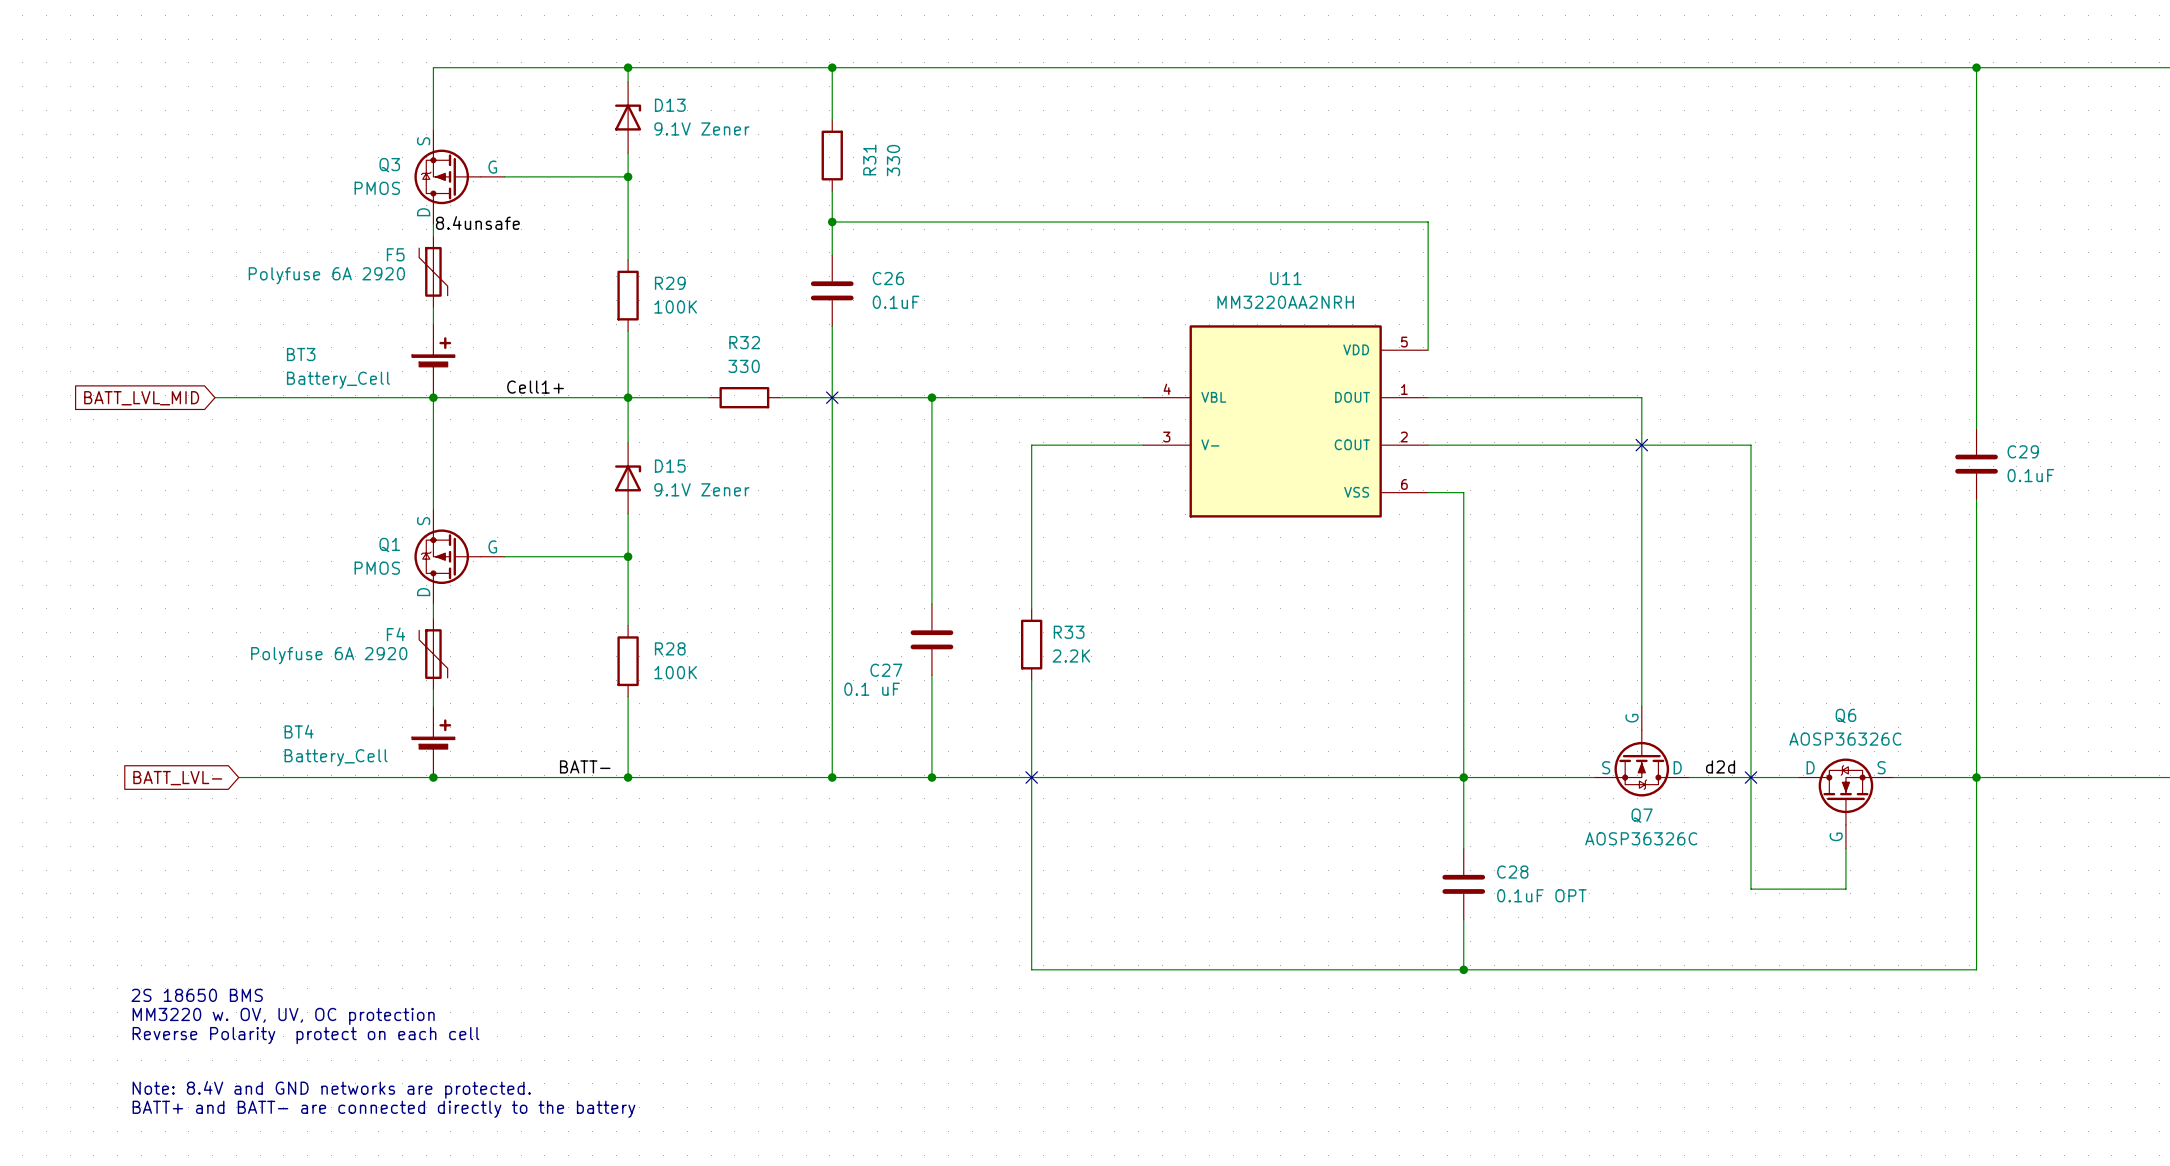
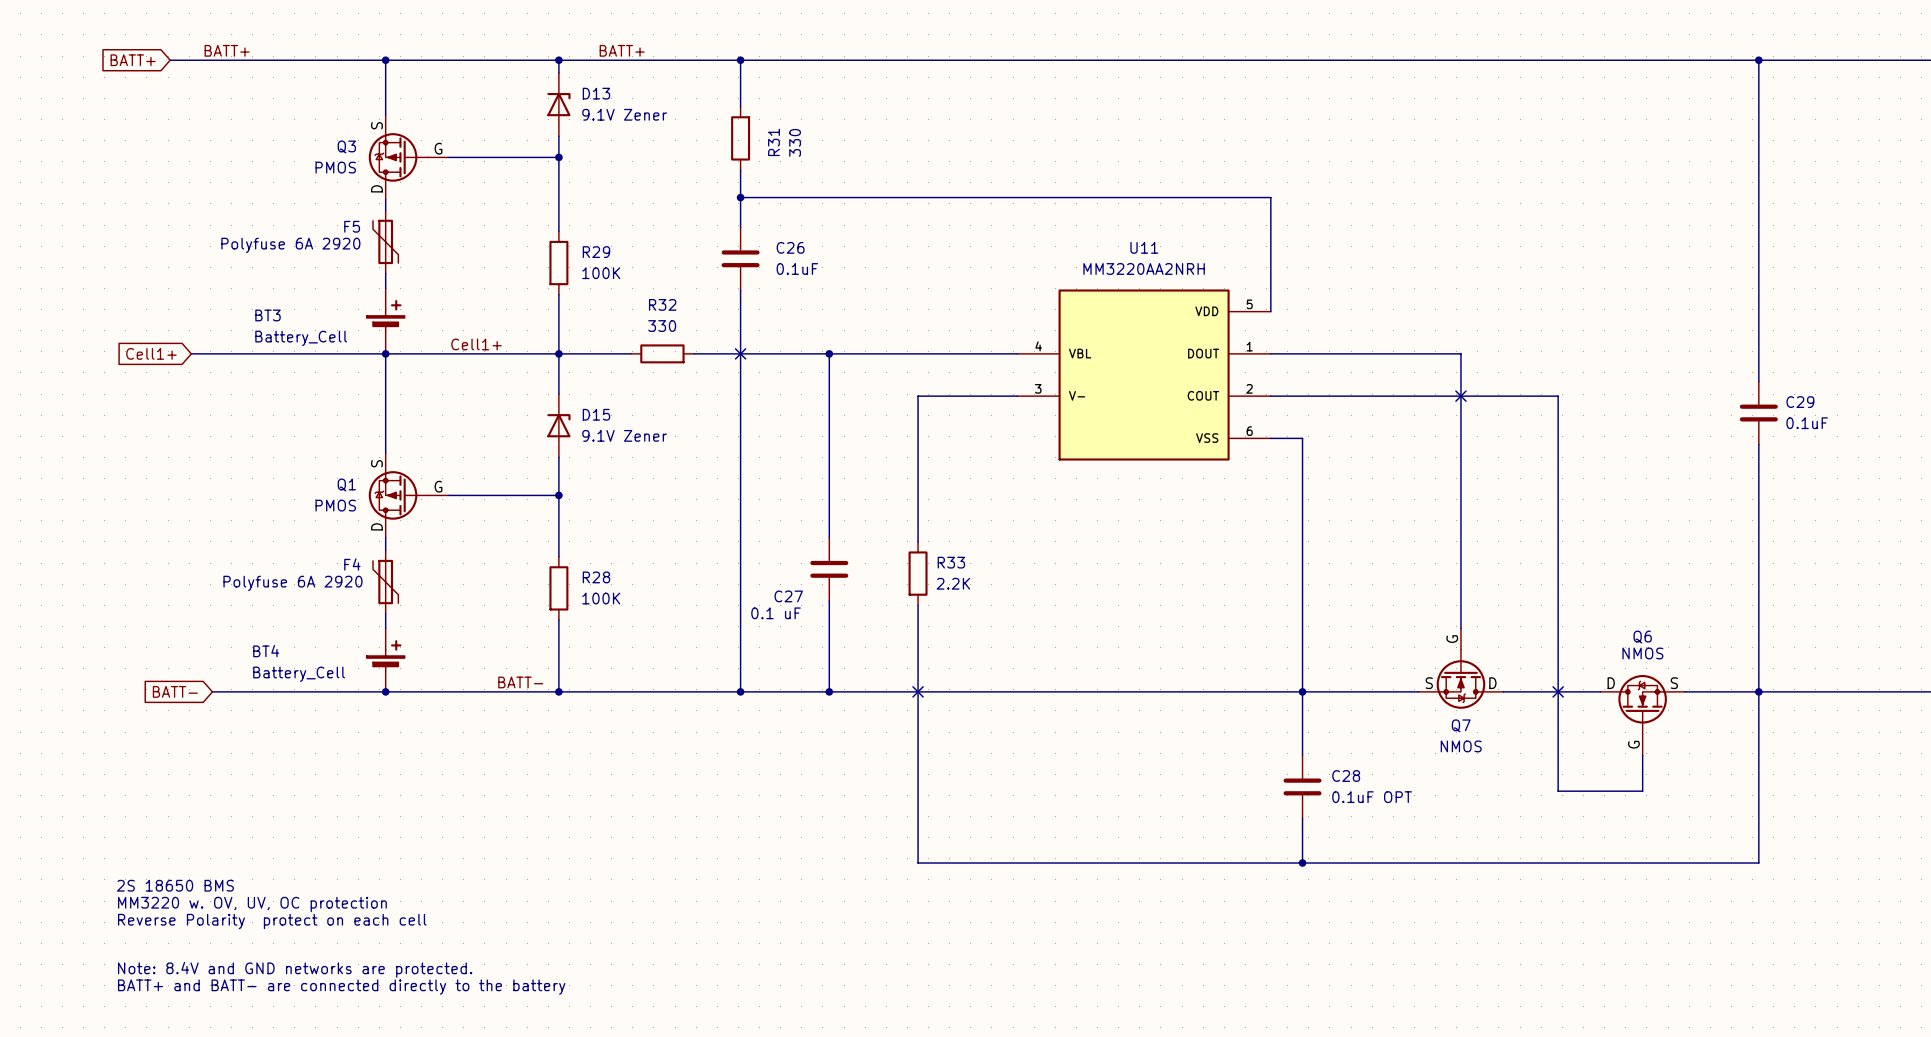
label: none -> BATT+ (227, 50)
label: none -> BATT+ (622, 50)
global label: none -> BATT+ (133, 60)
wire: none -> (170, 60) (385, 60)
junction: none -> (385, 60)
label: 8.4unsafe (477, 223) -> none
global label: BATT_LVL_MID (141, 398) -> Cell1+ (151, 353)
Q6 value: AOSP36326C (1845, 739) -> NMOS (1642, 653)
label: d2d (1720, 766) -> none
global label: BATT_LVL- (177, 778) -> BATT- (175, 691)
Q7 value: AOSP36326C (1641, 838) -> NMOS (1461, 746)

